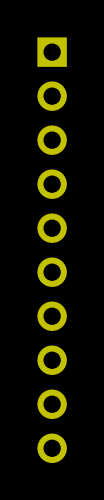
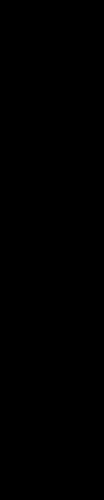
part: (52, 250) -> none

